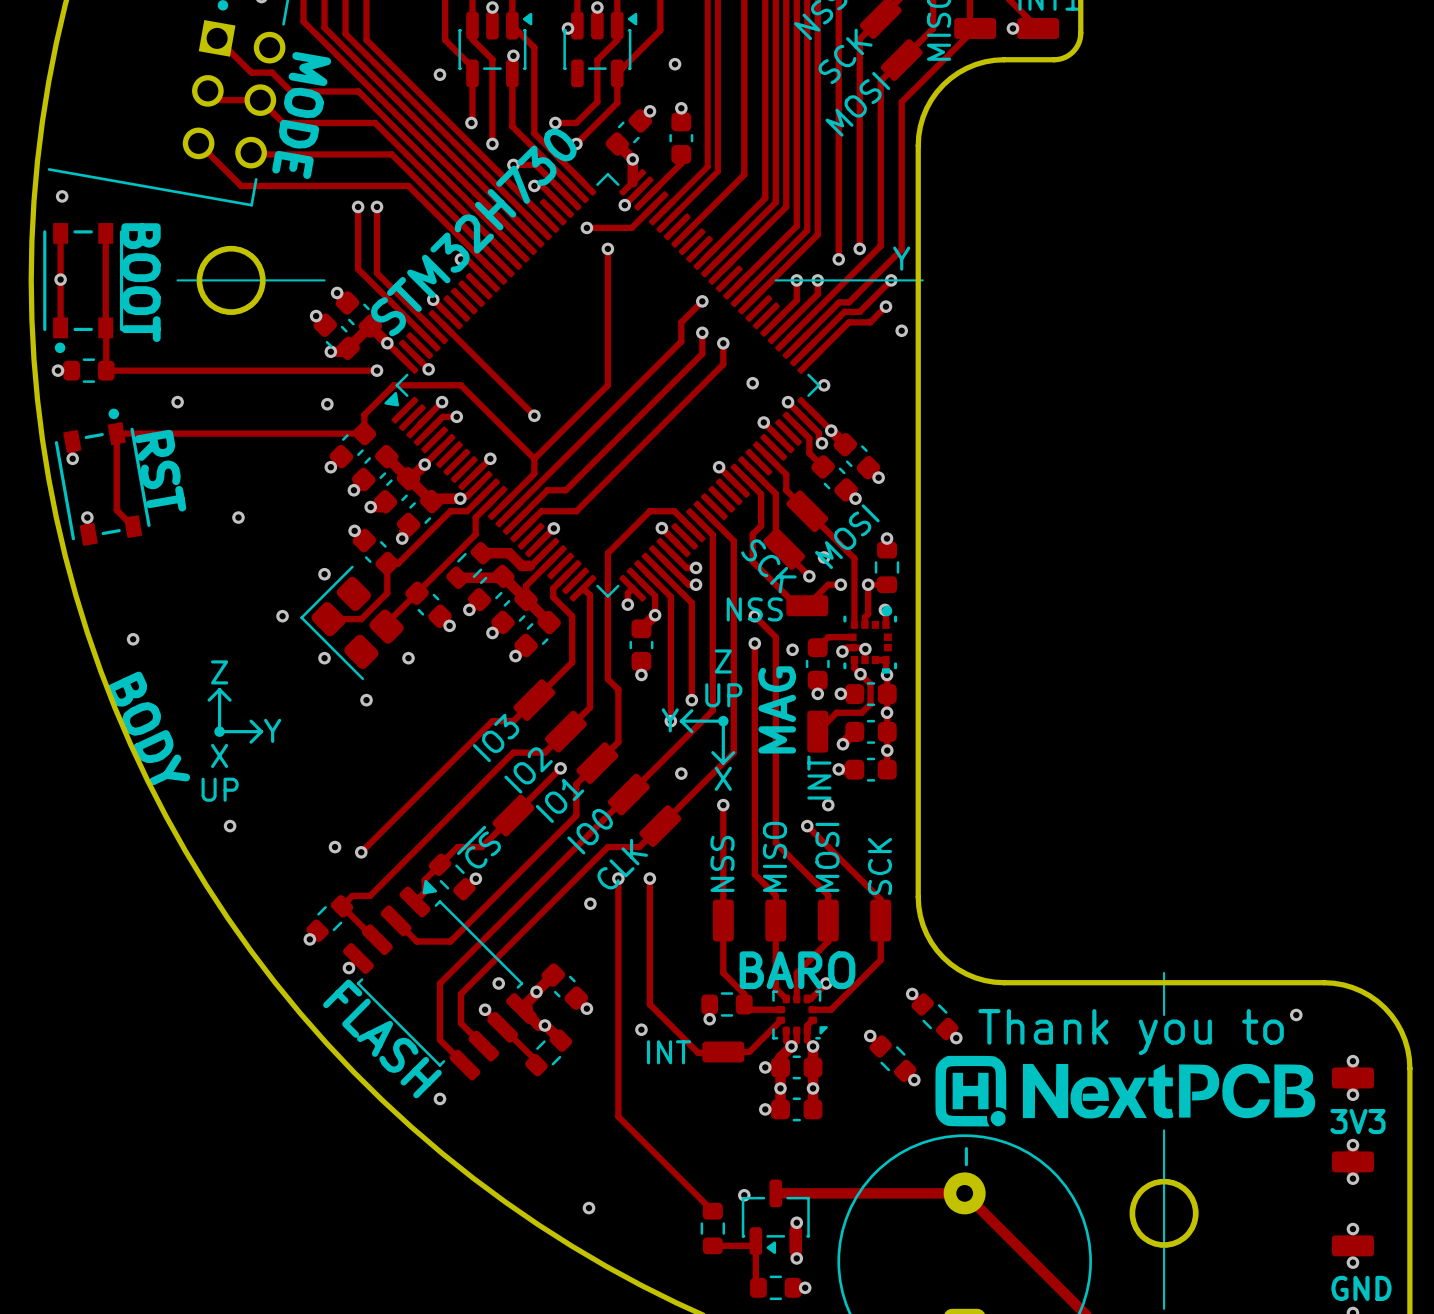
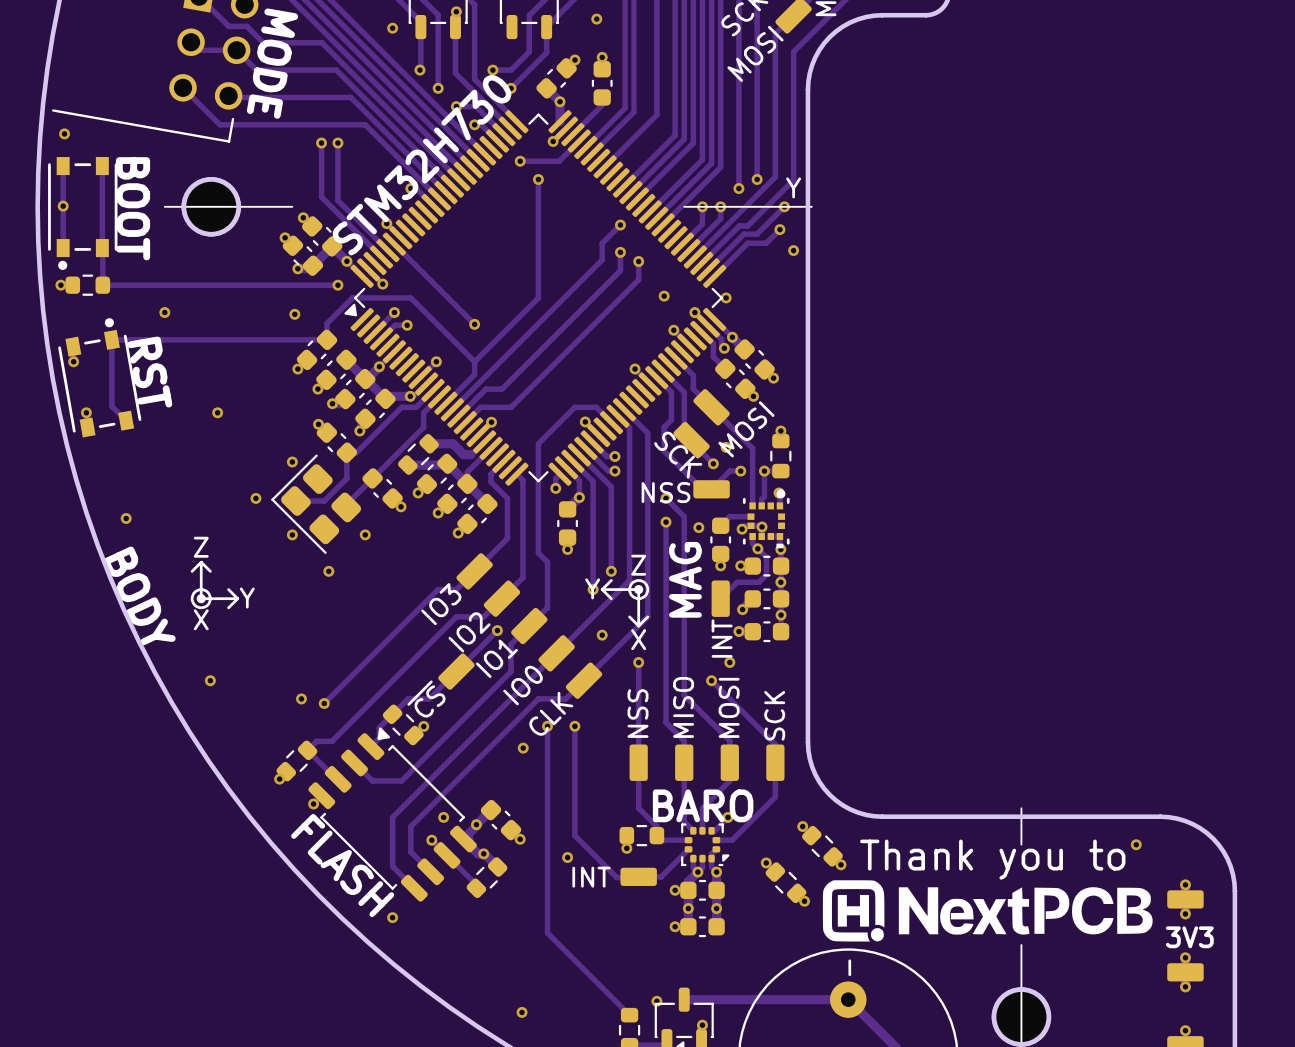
text: Z (723, 661) -> none
text: UP (723, 695) -> Z (638, 565)
drawing: none -> [628, 579, 650, 601]
drawing: none -> [190, 588, 212, 610]
text: UP (220, 789) -> none

